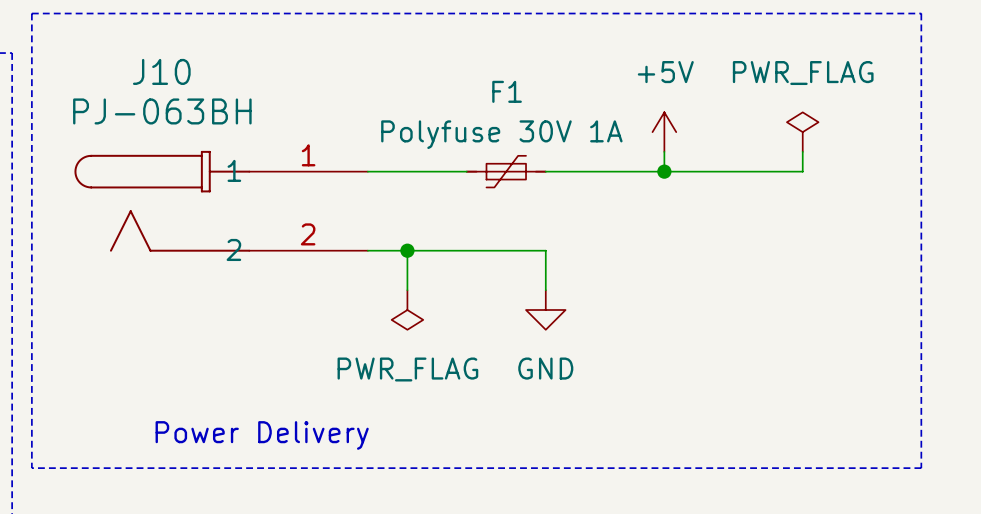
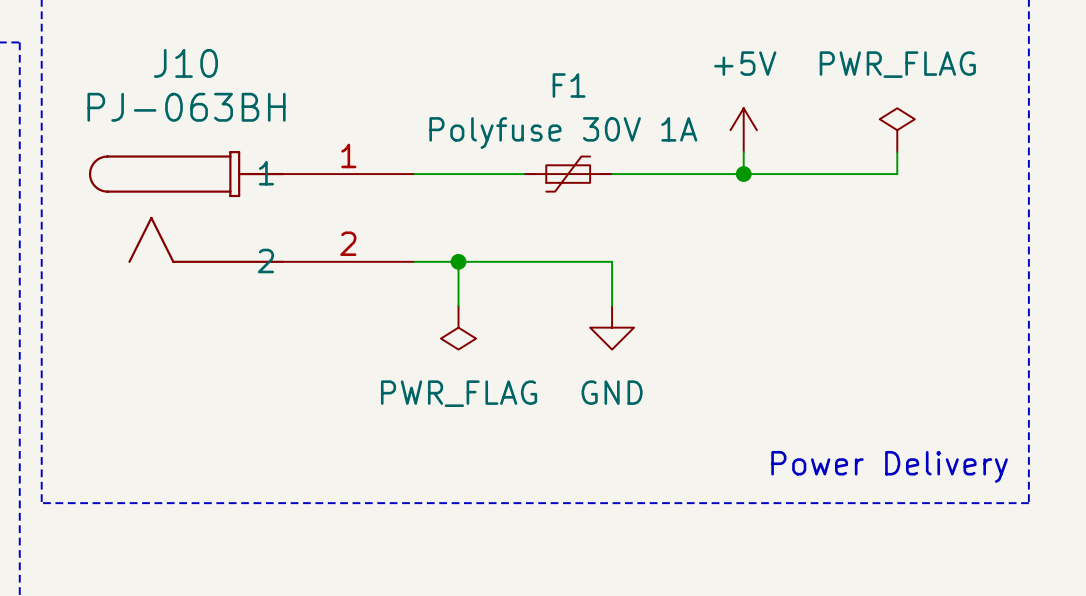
text: Power Delivery (262, 435) -> none
text: none -> Power Delivery (889, 466)

